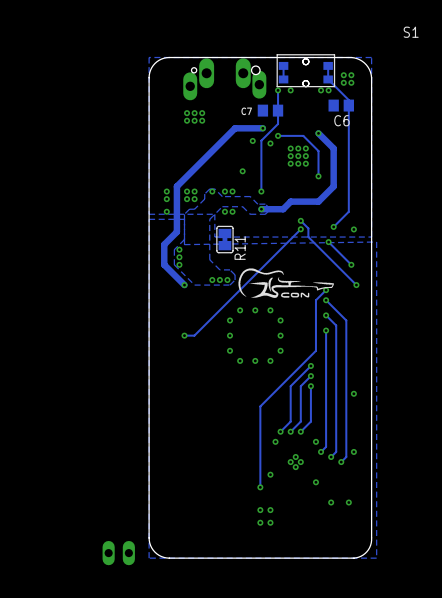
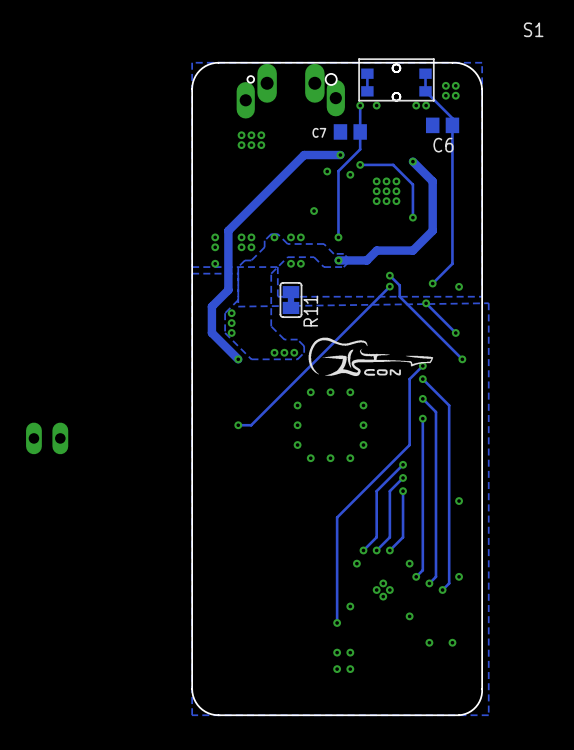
part: none -> (47, 438)
part: (118, 553) -> none

